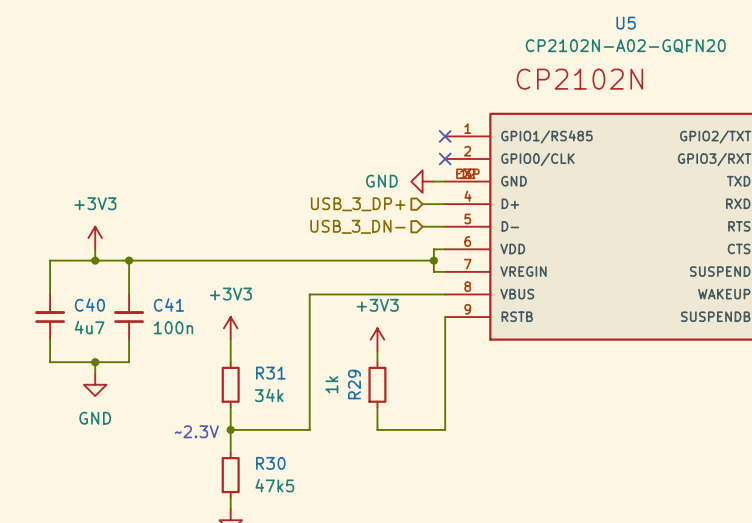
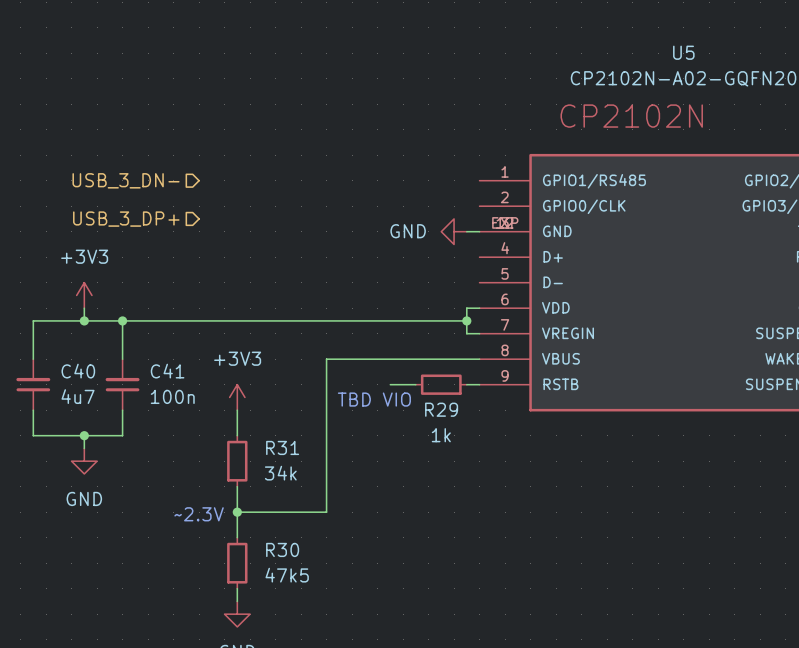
hierarchical label: none -> USB_3_DN- (126, 180)
no-connect mark: (445, 136) -> none
no-connect mark: (445, 158) -> none
hierarchical label: none -> USB_3_DP+ (126, 219)
hierarchical label: USB_3_DP+ (358, 204) -> none
wire: (422, 204) (445, 204) -> none
hierarchical label: USB_3_DN- (357, 226) -> none
wire: (422, 226) (445, 226) -> (390, 384) (415, 384)
wire: (445, 317) (445, 429) (377, 429) (377, 407) -> (479, 384) (466, 384)
text: none -> TBD VIO (374, 399)
power symbol: +3V3 (377, 339) -> none
wire: (377, 350) (377, 362) -> none
R29 text position: 1k (331, 384) -> 1k (441, 435)
R29 name position: R29 (354, 384) -> R29 (441, 409)
R29 rotation: 0° (377, 384) -> 90° clockwise (441, 384)
R29 position: (377, 384) -> (441, 384)

